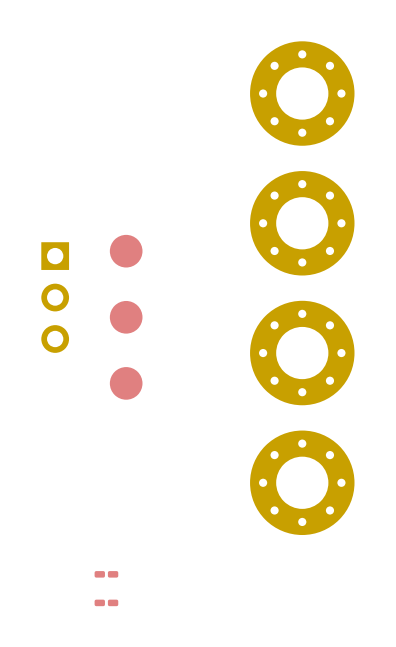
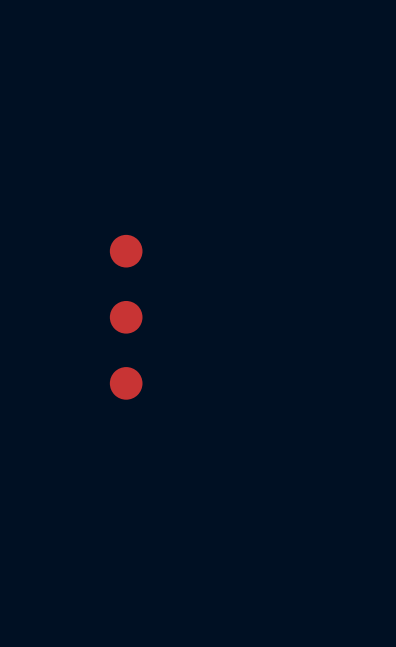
part: (302, 93) -> none
part: (302, 223) -> none
part: (55, 297) -> none
part: (302, 353) -> none
part: (302, 482) -> none
part: (106, 574) -> none
part: (106, 602) -> none

